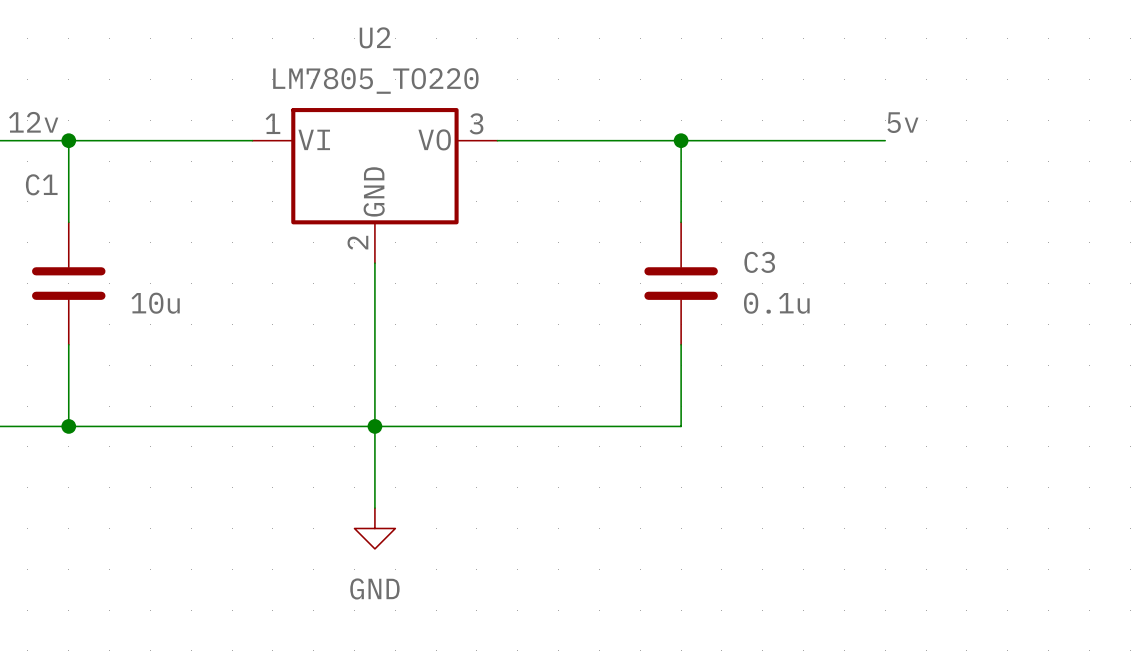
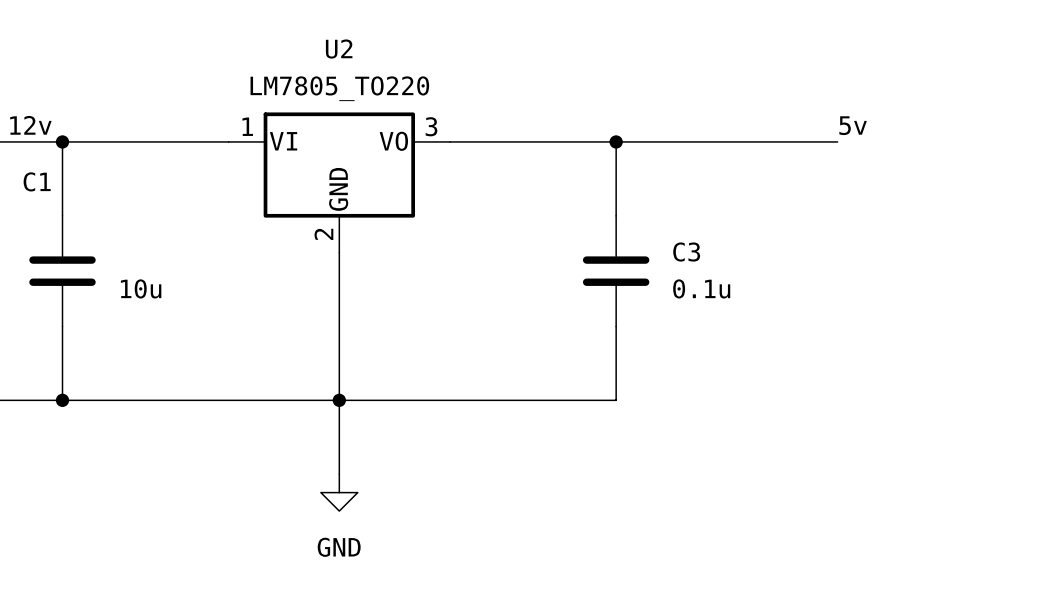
label position: 5v (902, 122) -> 5v (853, 125)
wire: none -> (800, 141) (837, 141)

